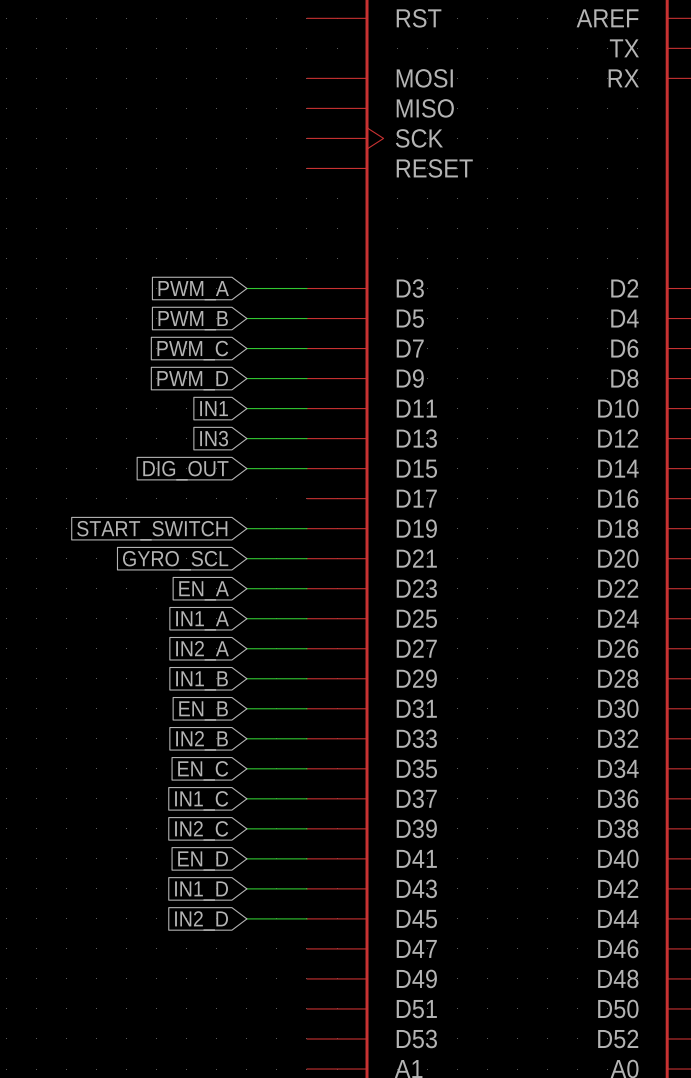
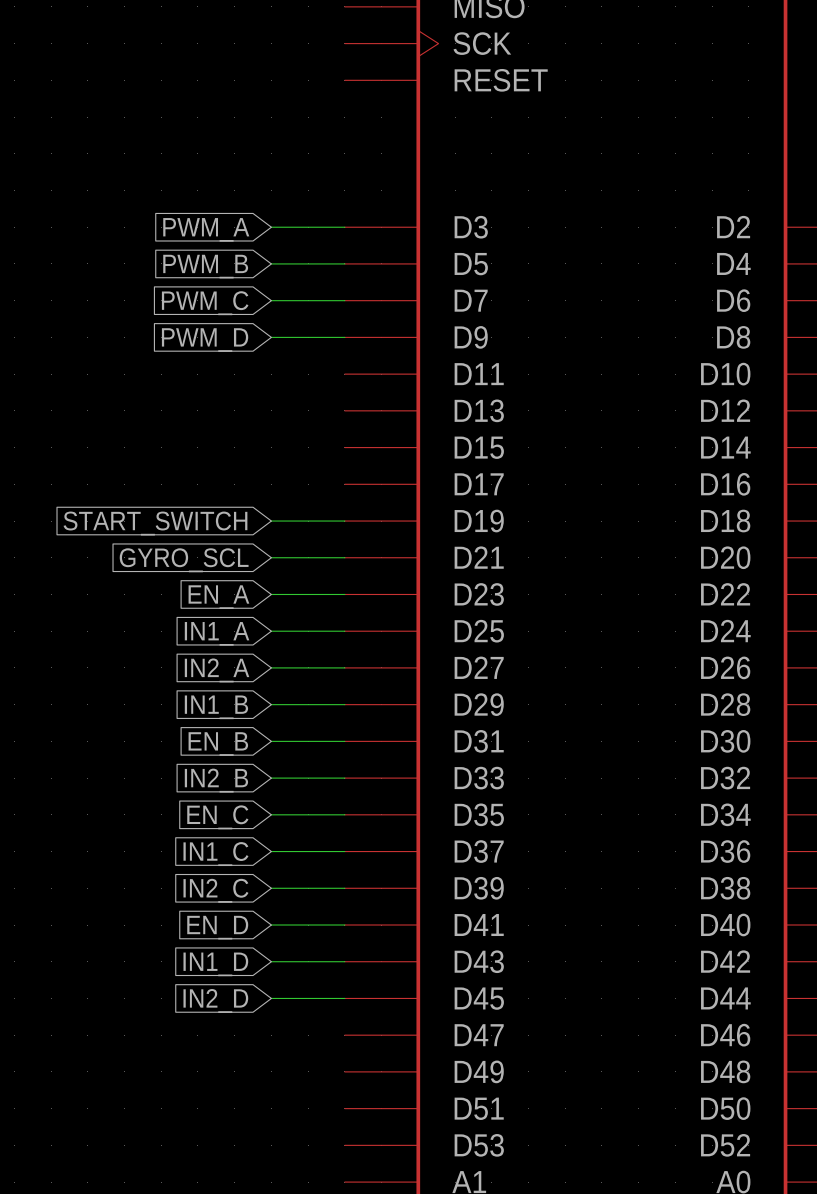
global label: IN1 (214, 408) -> none
wire: (246, 408) (306, 408) -> none
global label: IN3 (214, 438) -> none
wire: (246, 438) (306, 438) -> none
wire: (246, 468) (306, 468) -> none
global label: DIG_OUT (185, 470) -> none

